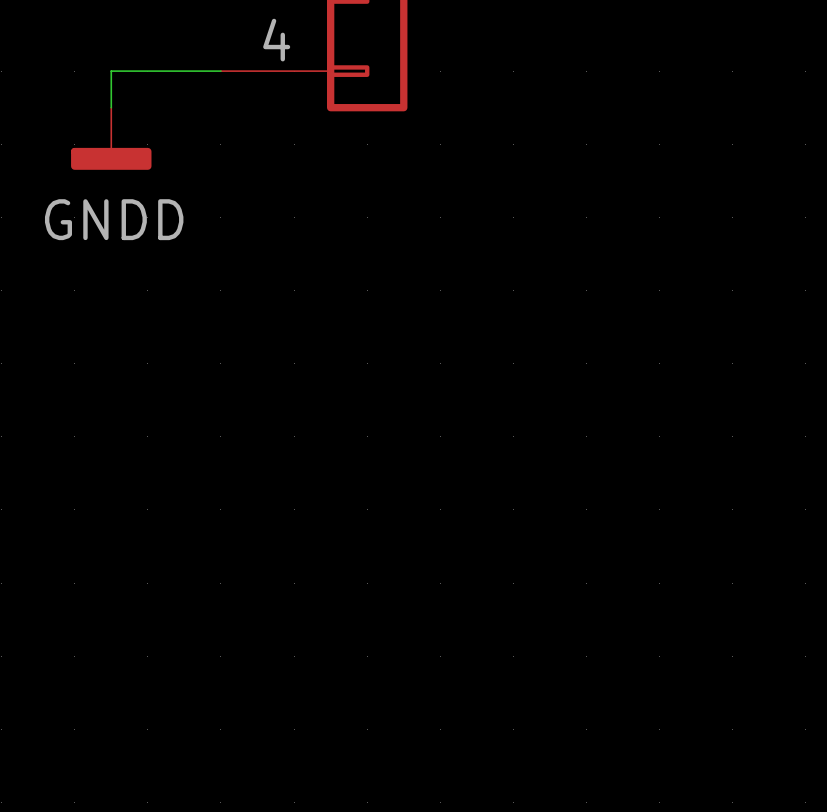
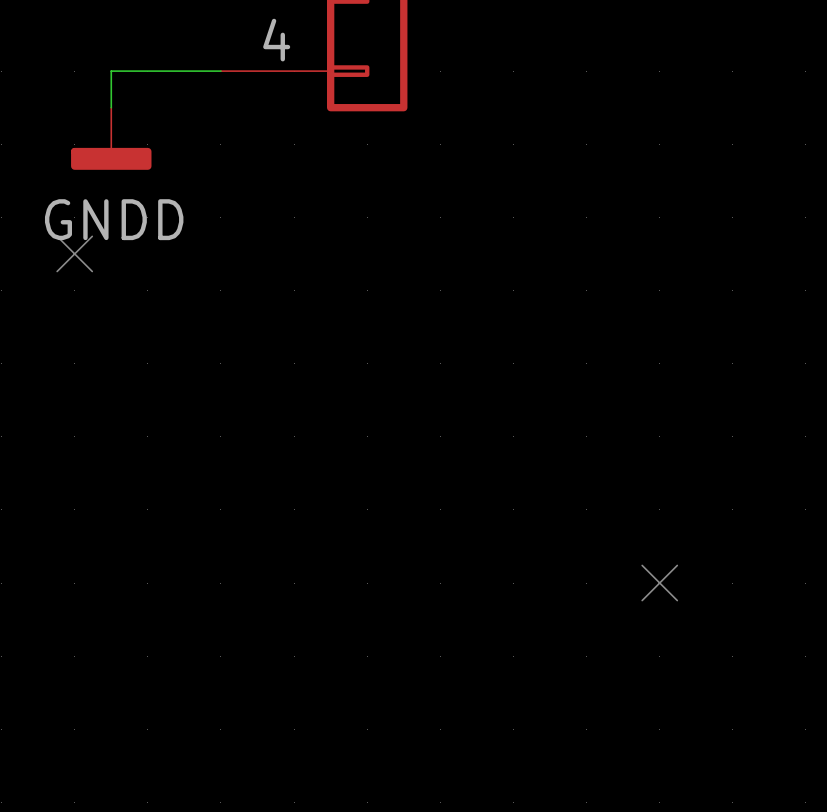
no-connect mark: none -> (74, 253)
no-connect mark: none -> (659, 583)

